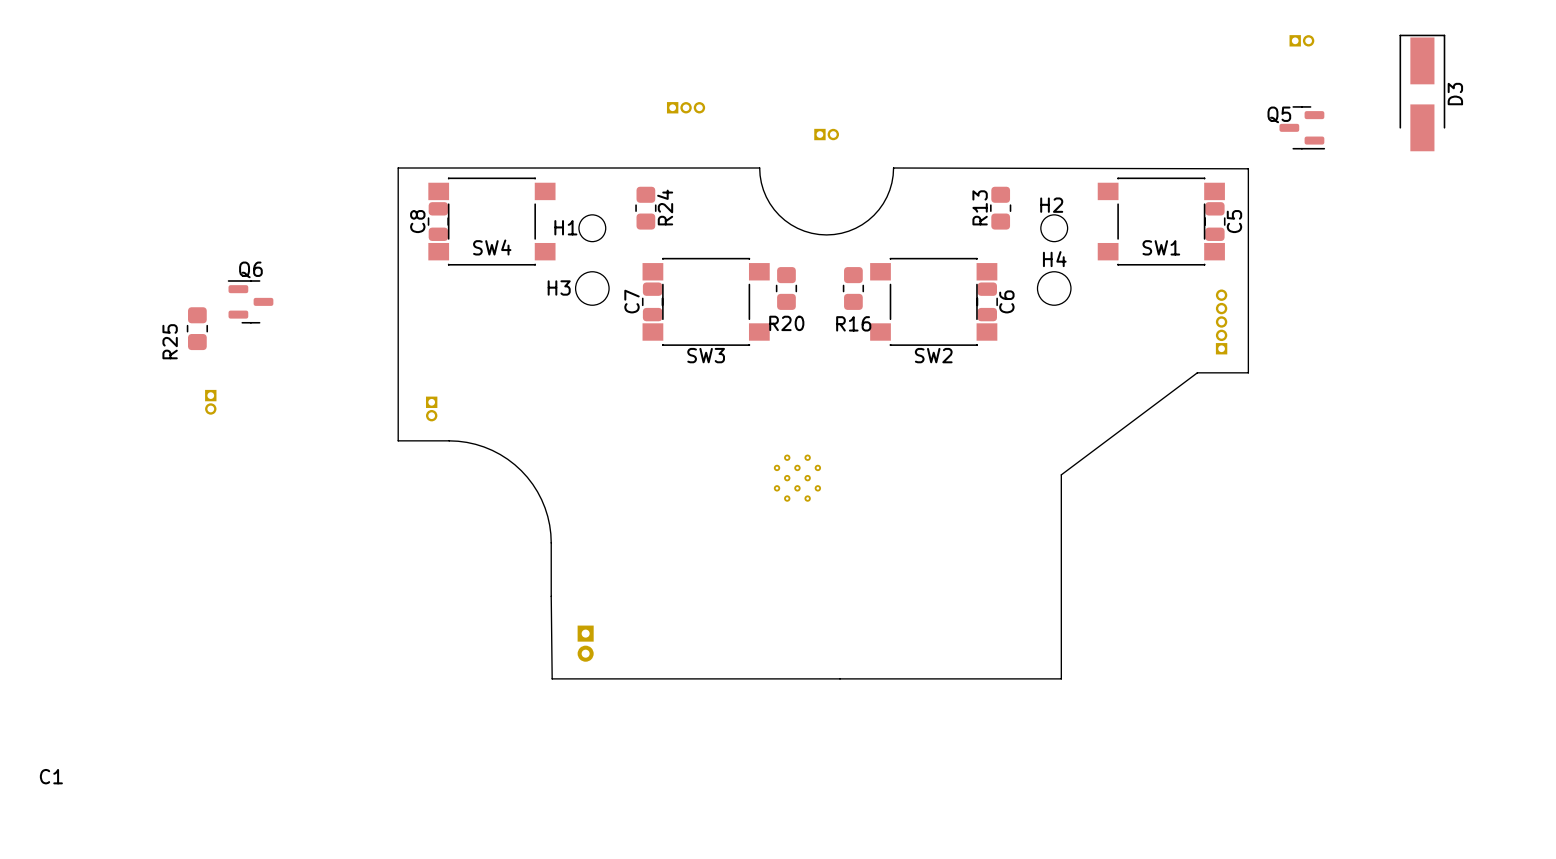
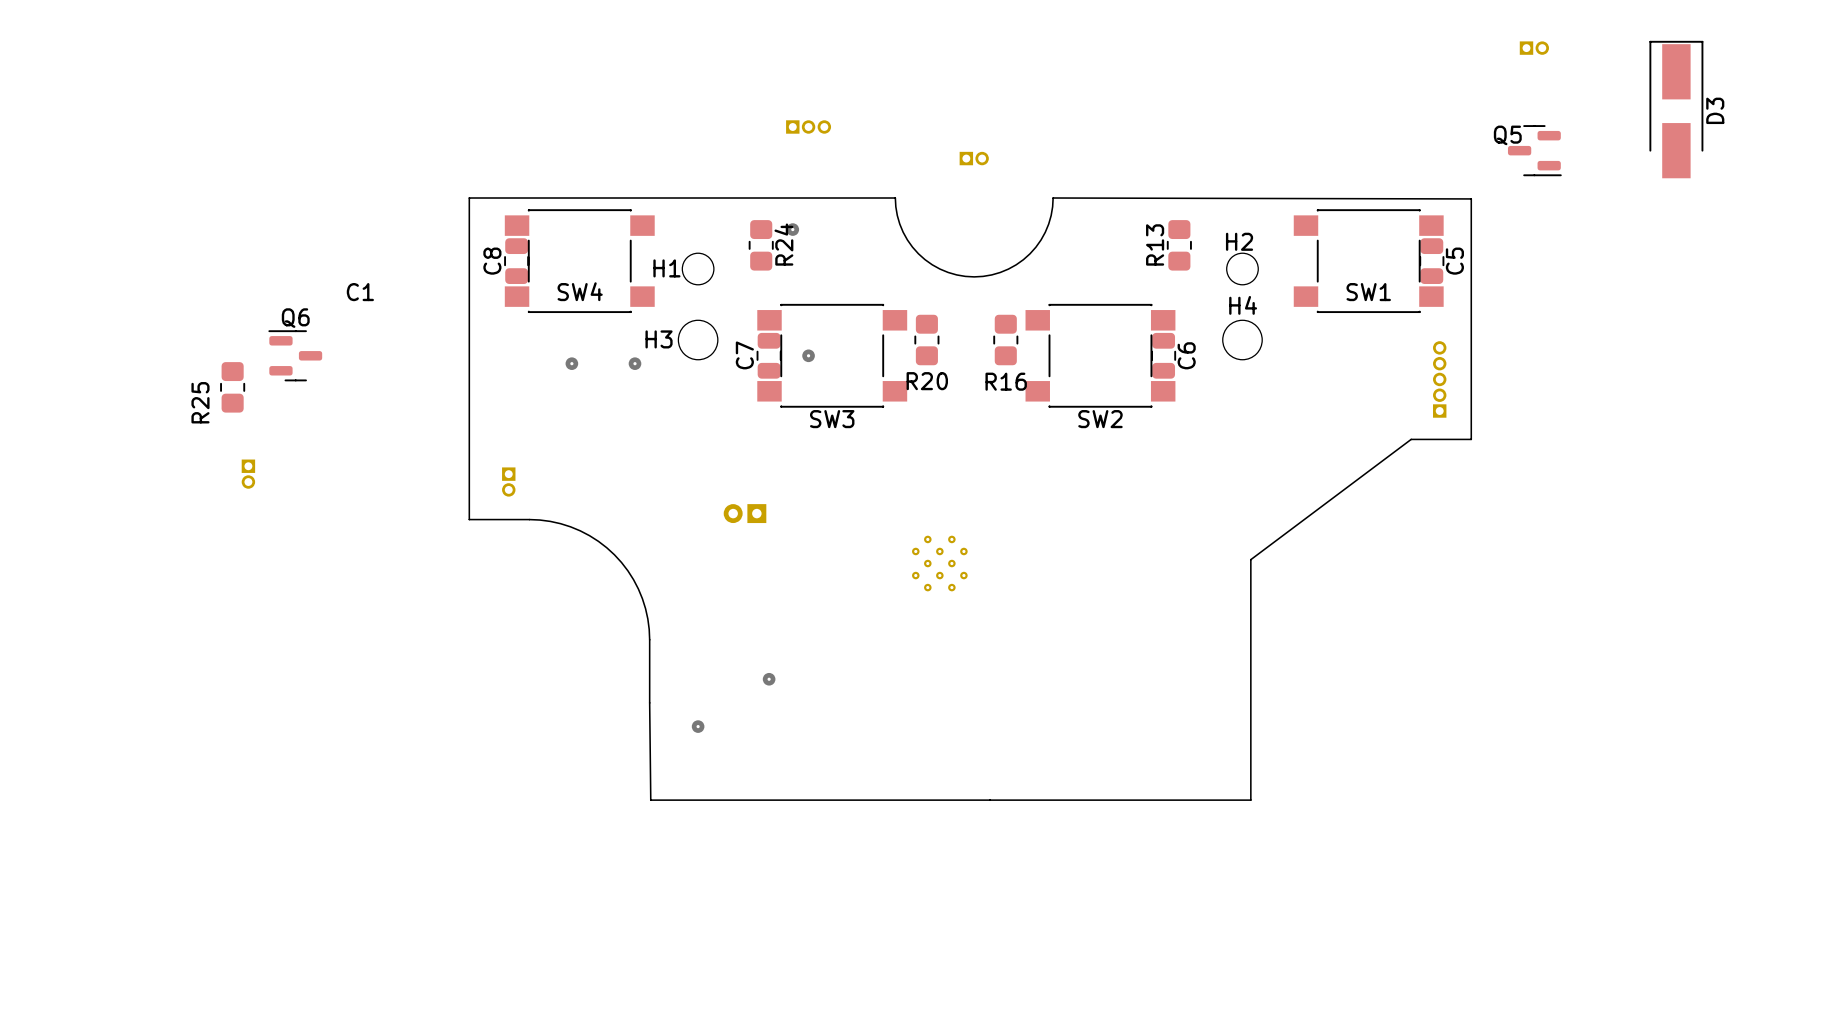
via: none -> (792, 229)
via: none -> (808, 355)
via: none -> (571, 363)
via: none -> (634, 363)
via: none -> (769, 679)
via: none -> (698, 726)
part rotation: 0° (585, 643) -> 90° clockwise (745, 513)
part position: (585, 643) -> (745, 513)
C1 position: (51, 776) -> (360, 292)

